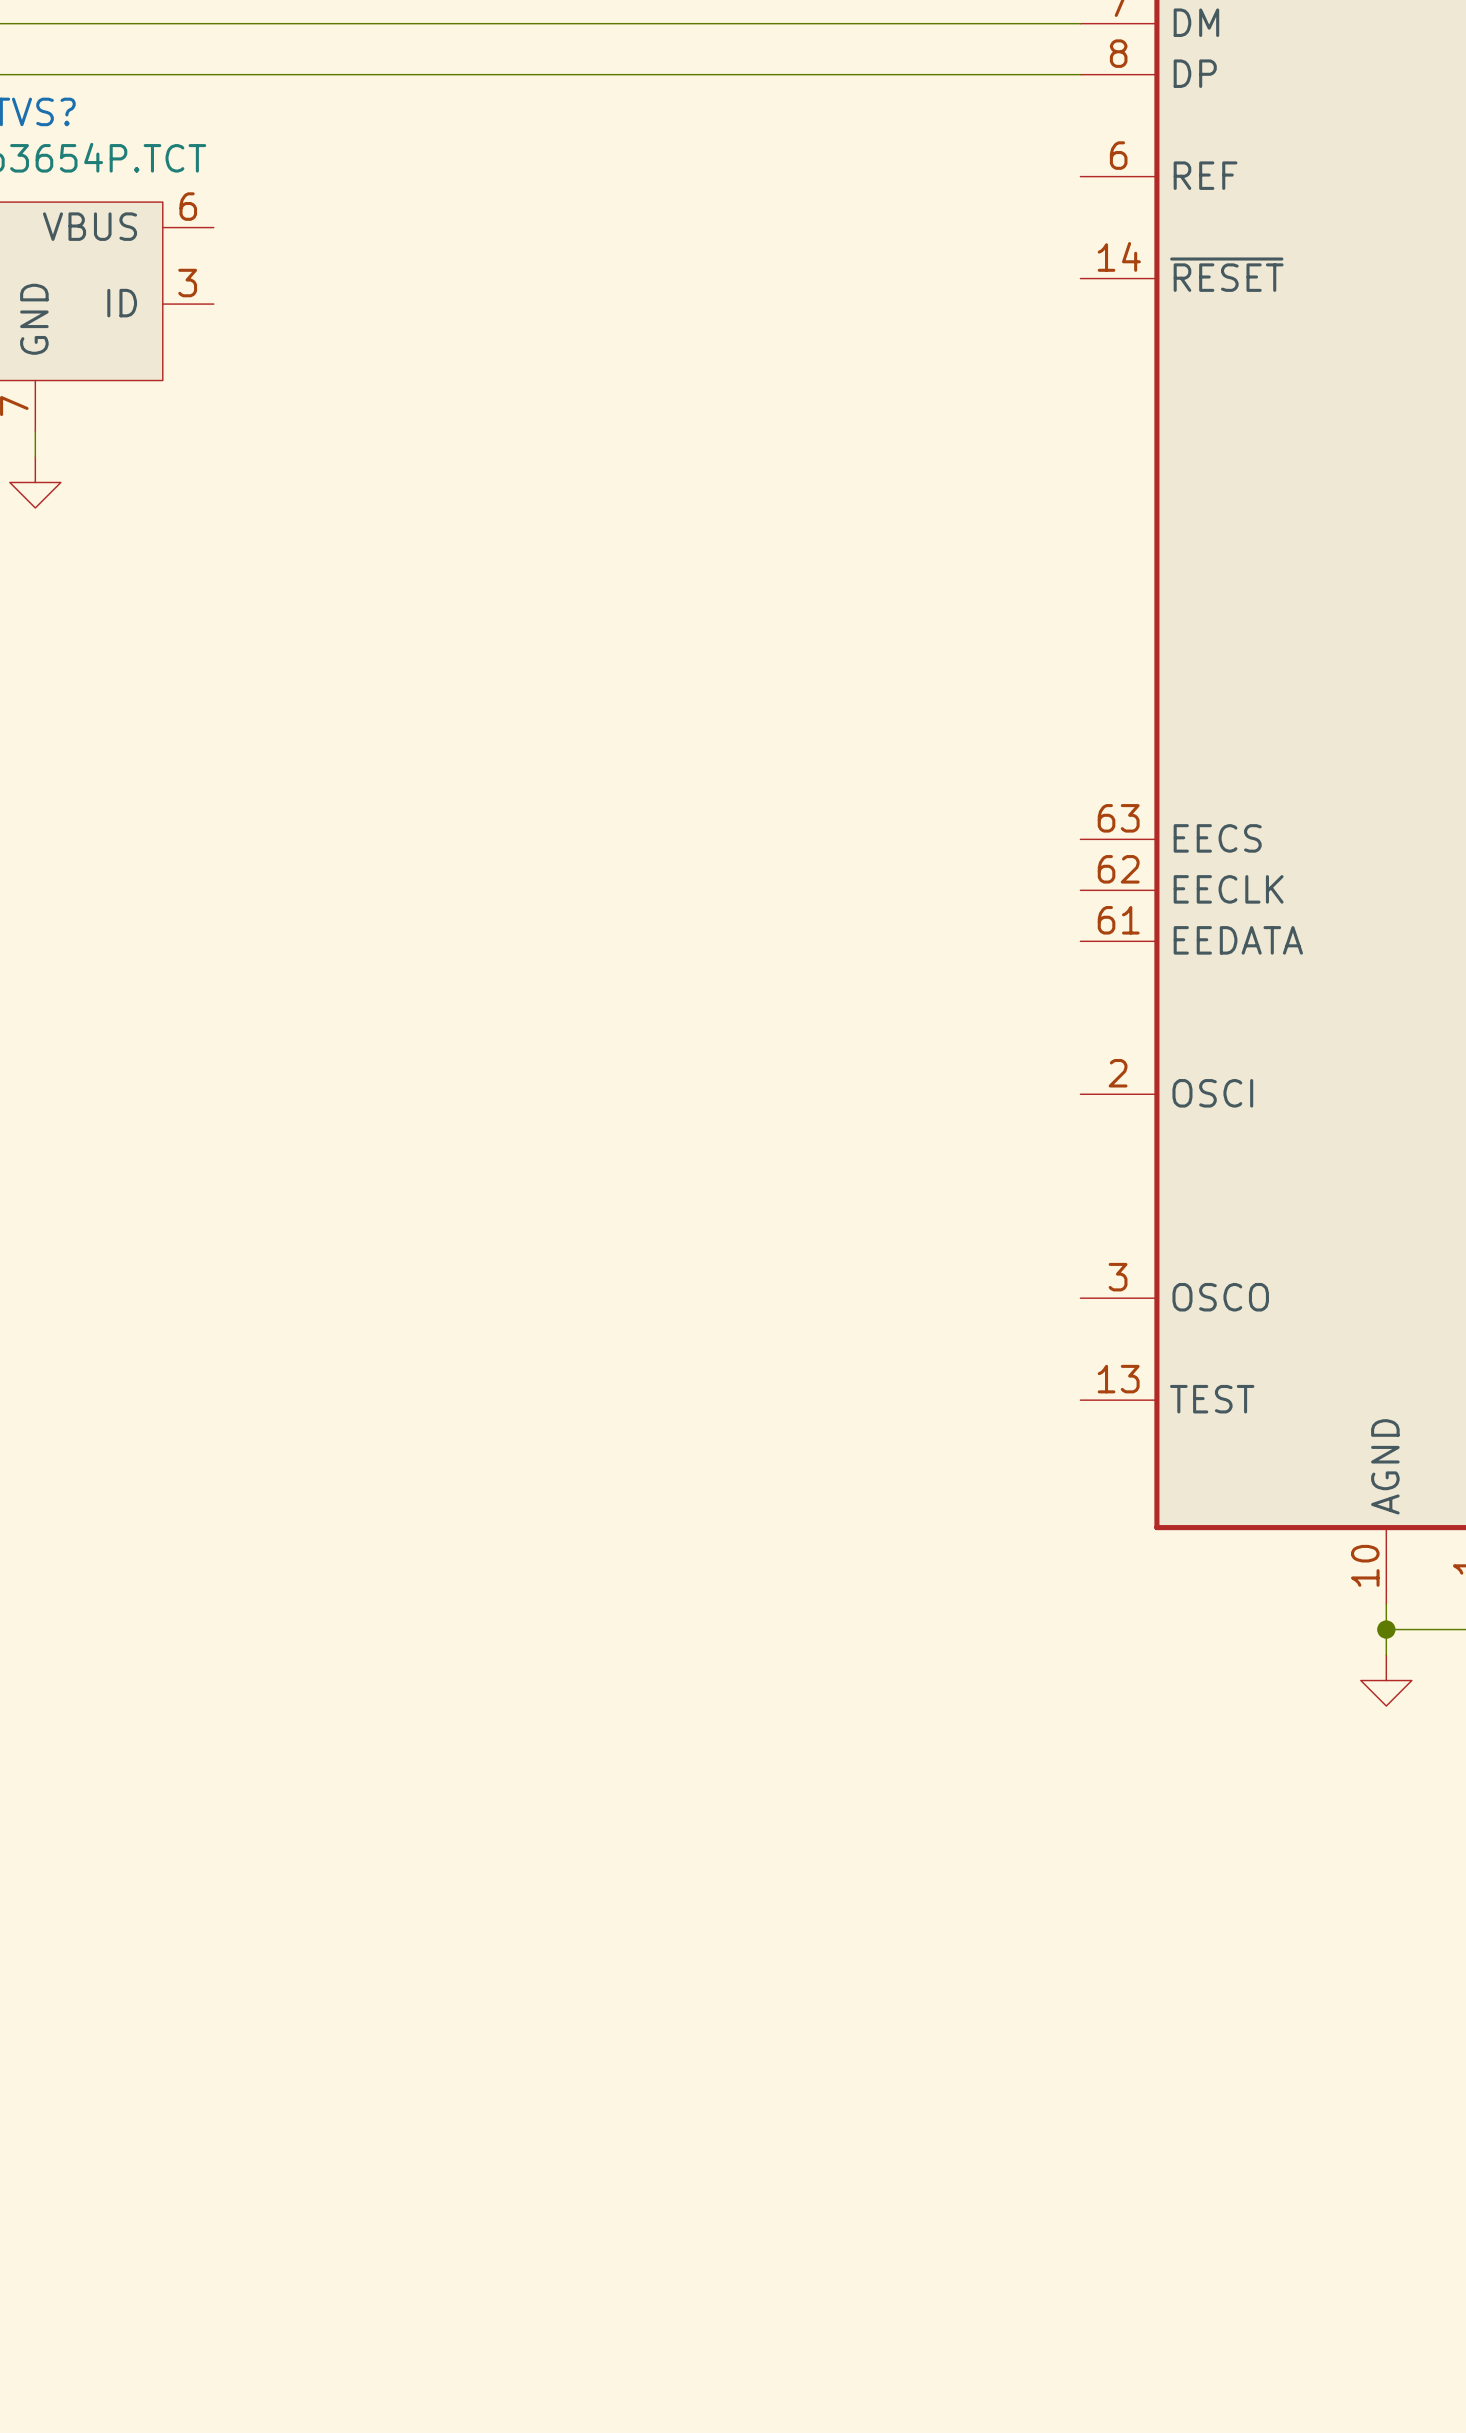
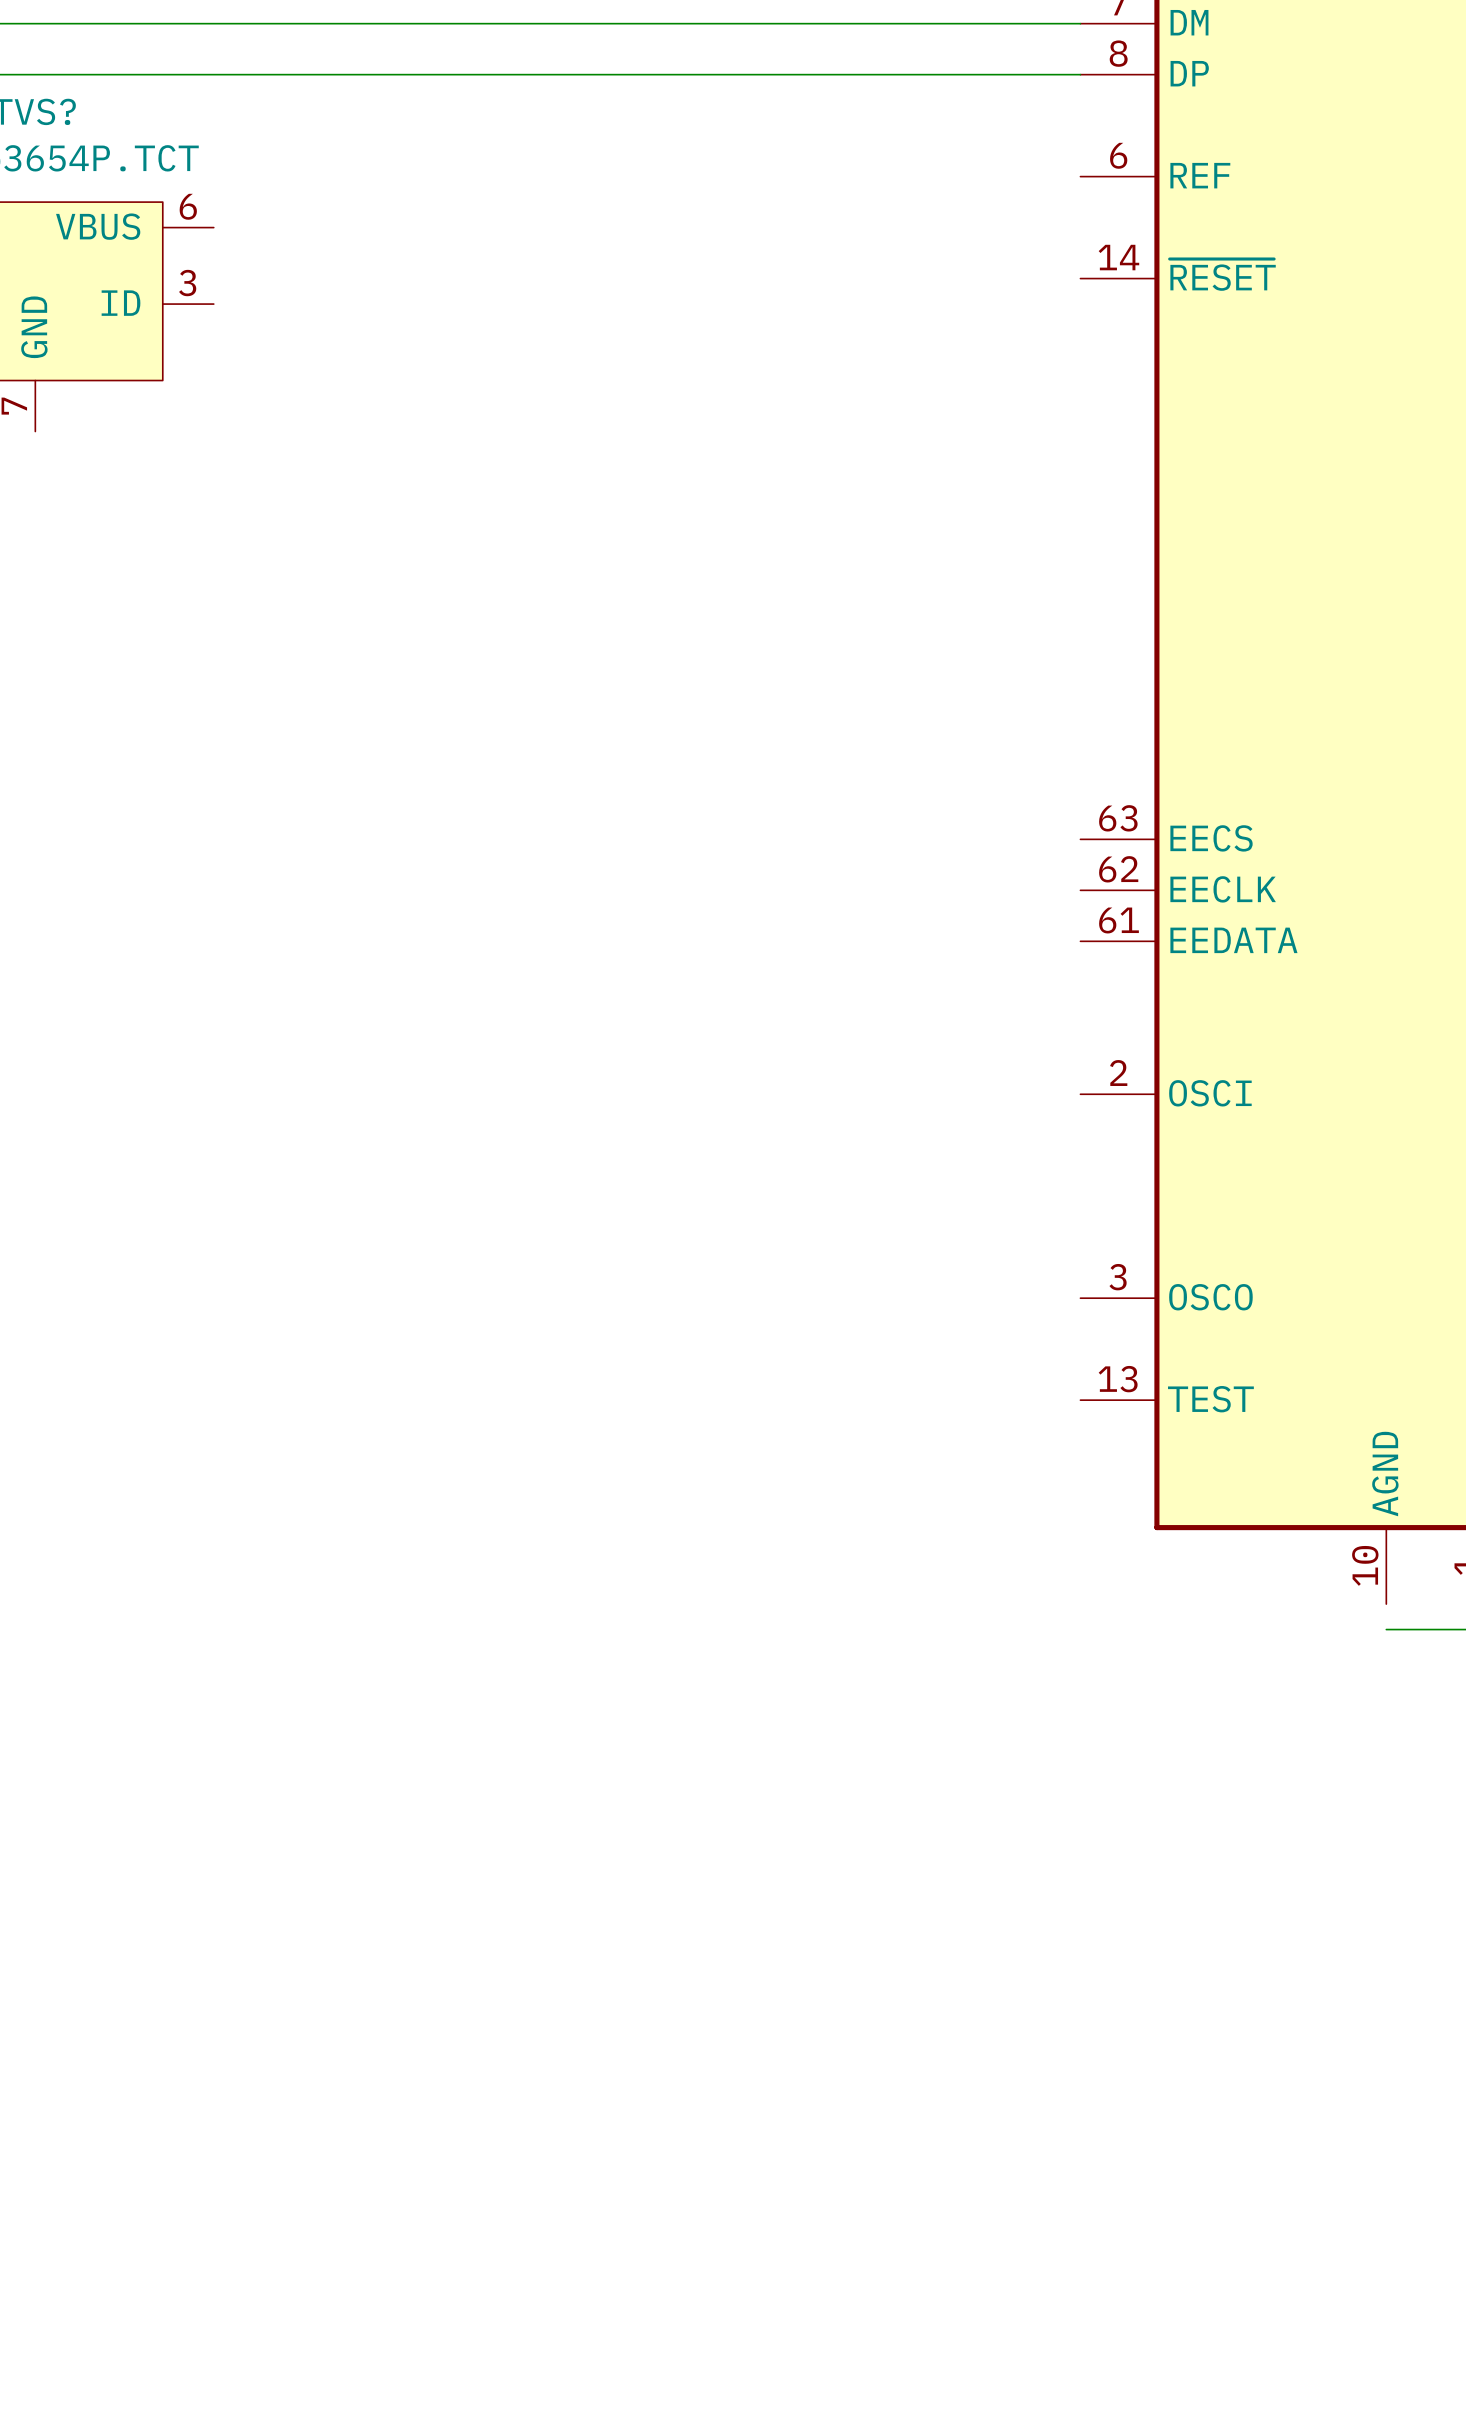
wire: (35, 431) (35, 457) -> none
power symbol: (35, 482) -> none
wire: (1386, 1604) (1386, 1655) -> none
junction: (1386, 1629) -> none
power symbol: (1386, 1680) -> none

